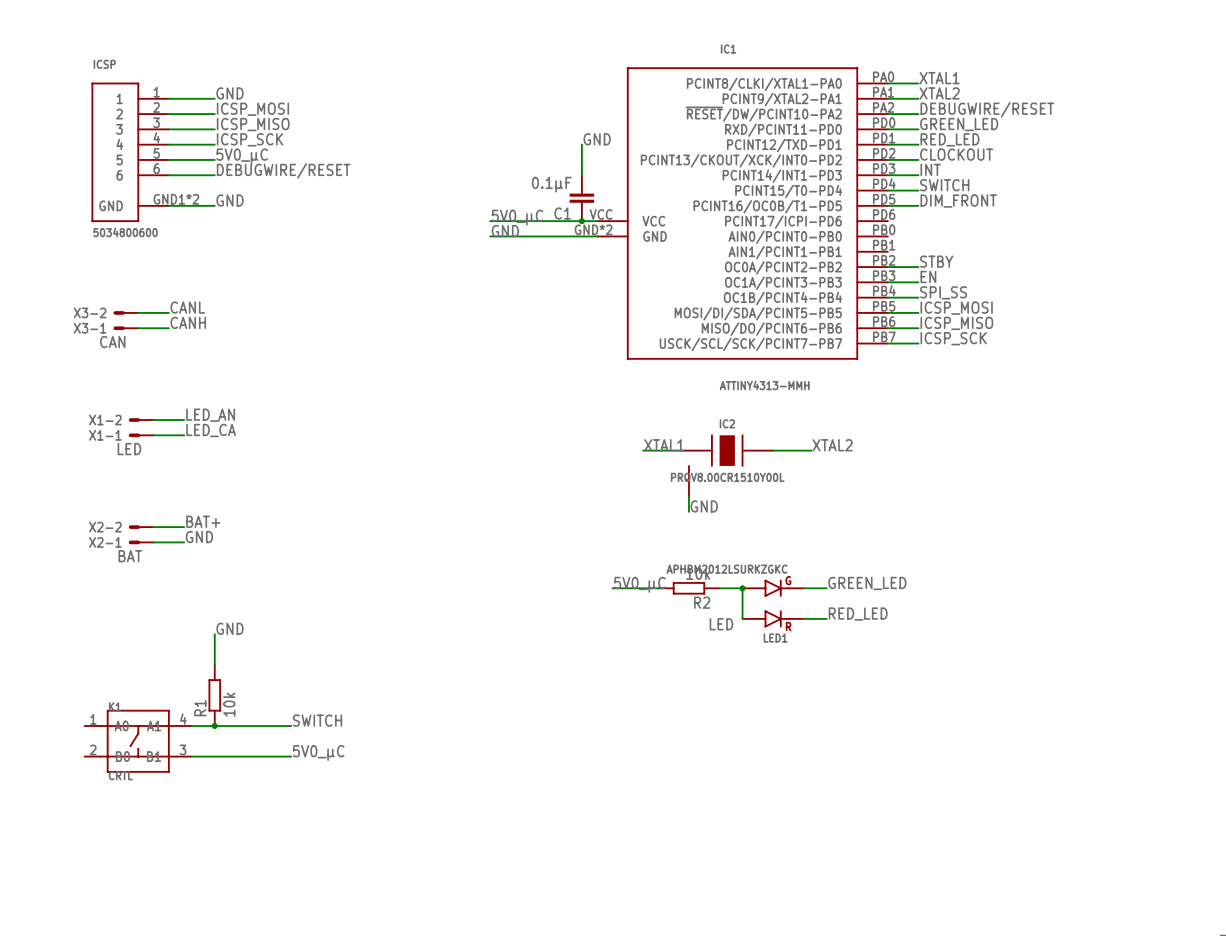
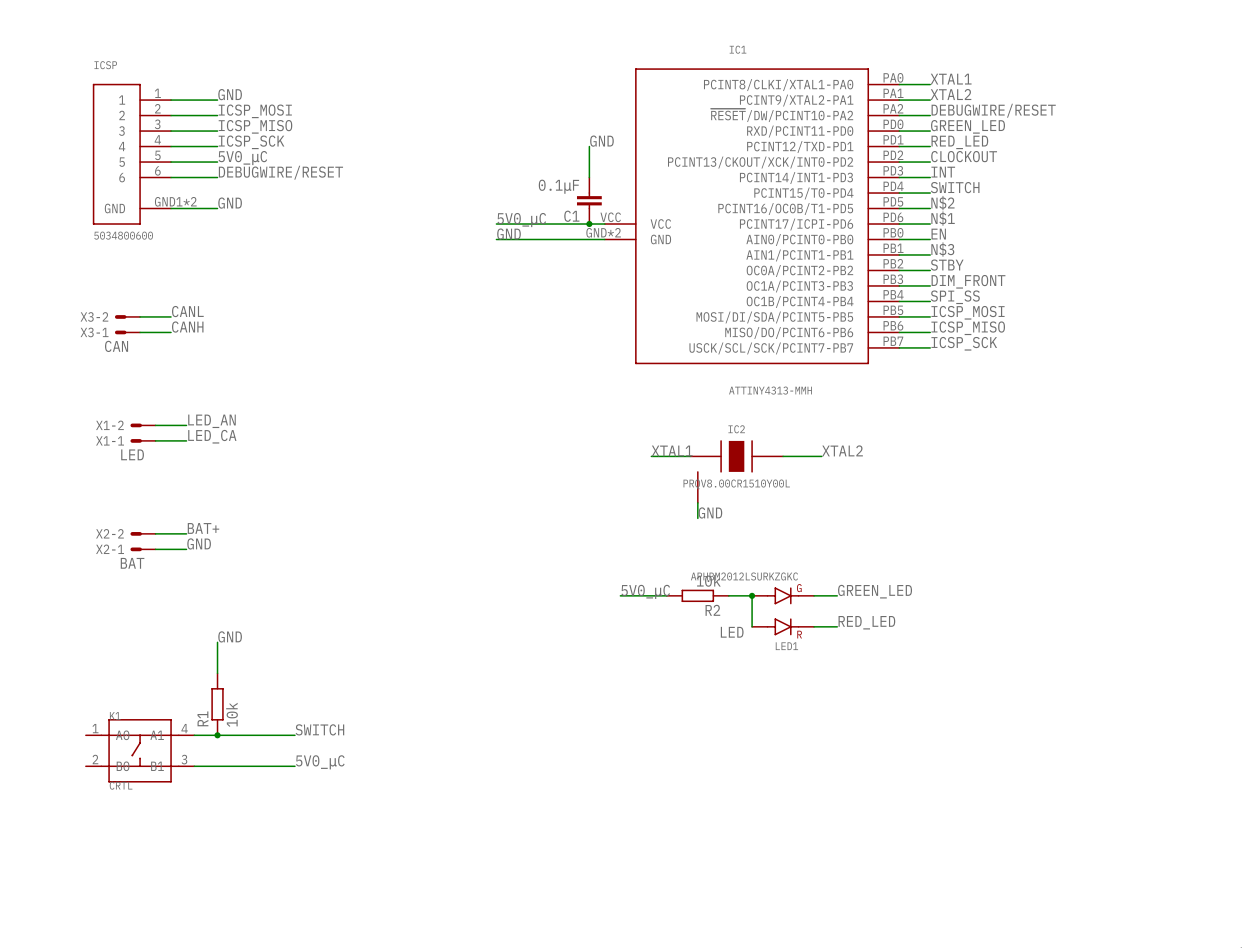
label: DIM_FRONT (958, 201) -> N$2 (942, 203)
label: none -> N$1 (943, 218)
wire: none -> (899, 224) (930, 224)
label: none -> EN (938, 234)
wire: none -> (899, 239) (930, 239)
label: none -> N$3 (942, 249)
wire: none -> (899, 254) (930, 254)
label: EN (928, 276) -> DIM_FRONT (968, 281)

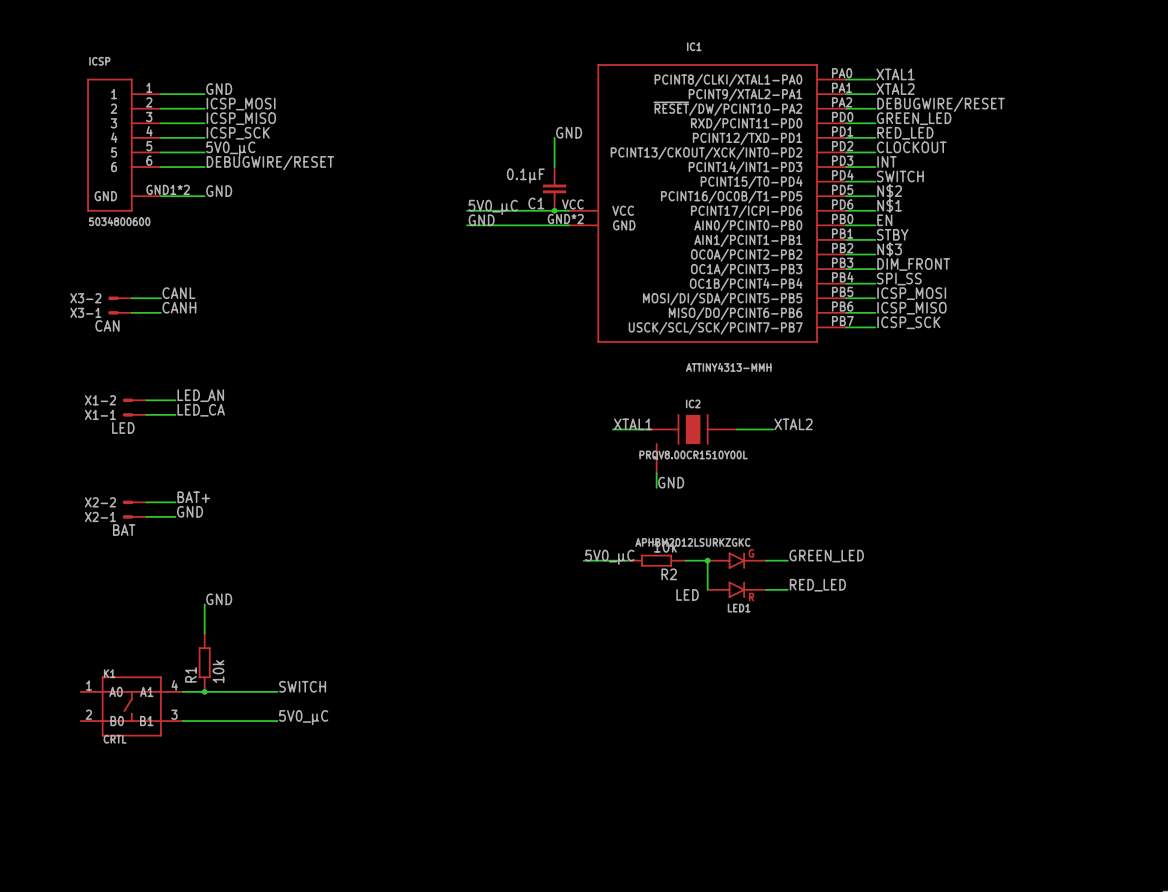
label: N$3 (942, 249) -> STBY (892, 234)
label: STBY (947, 265) -> N$3 (889, 249)

